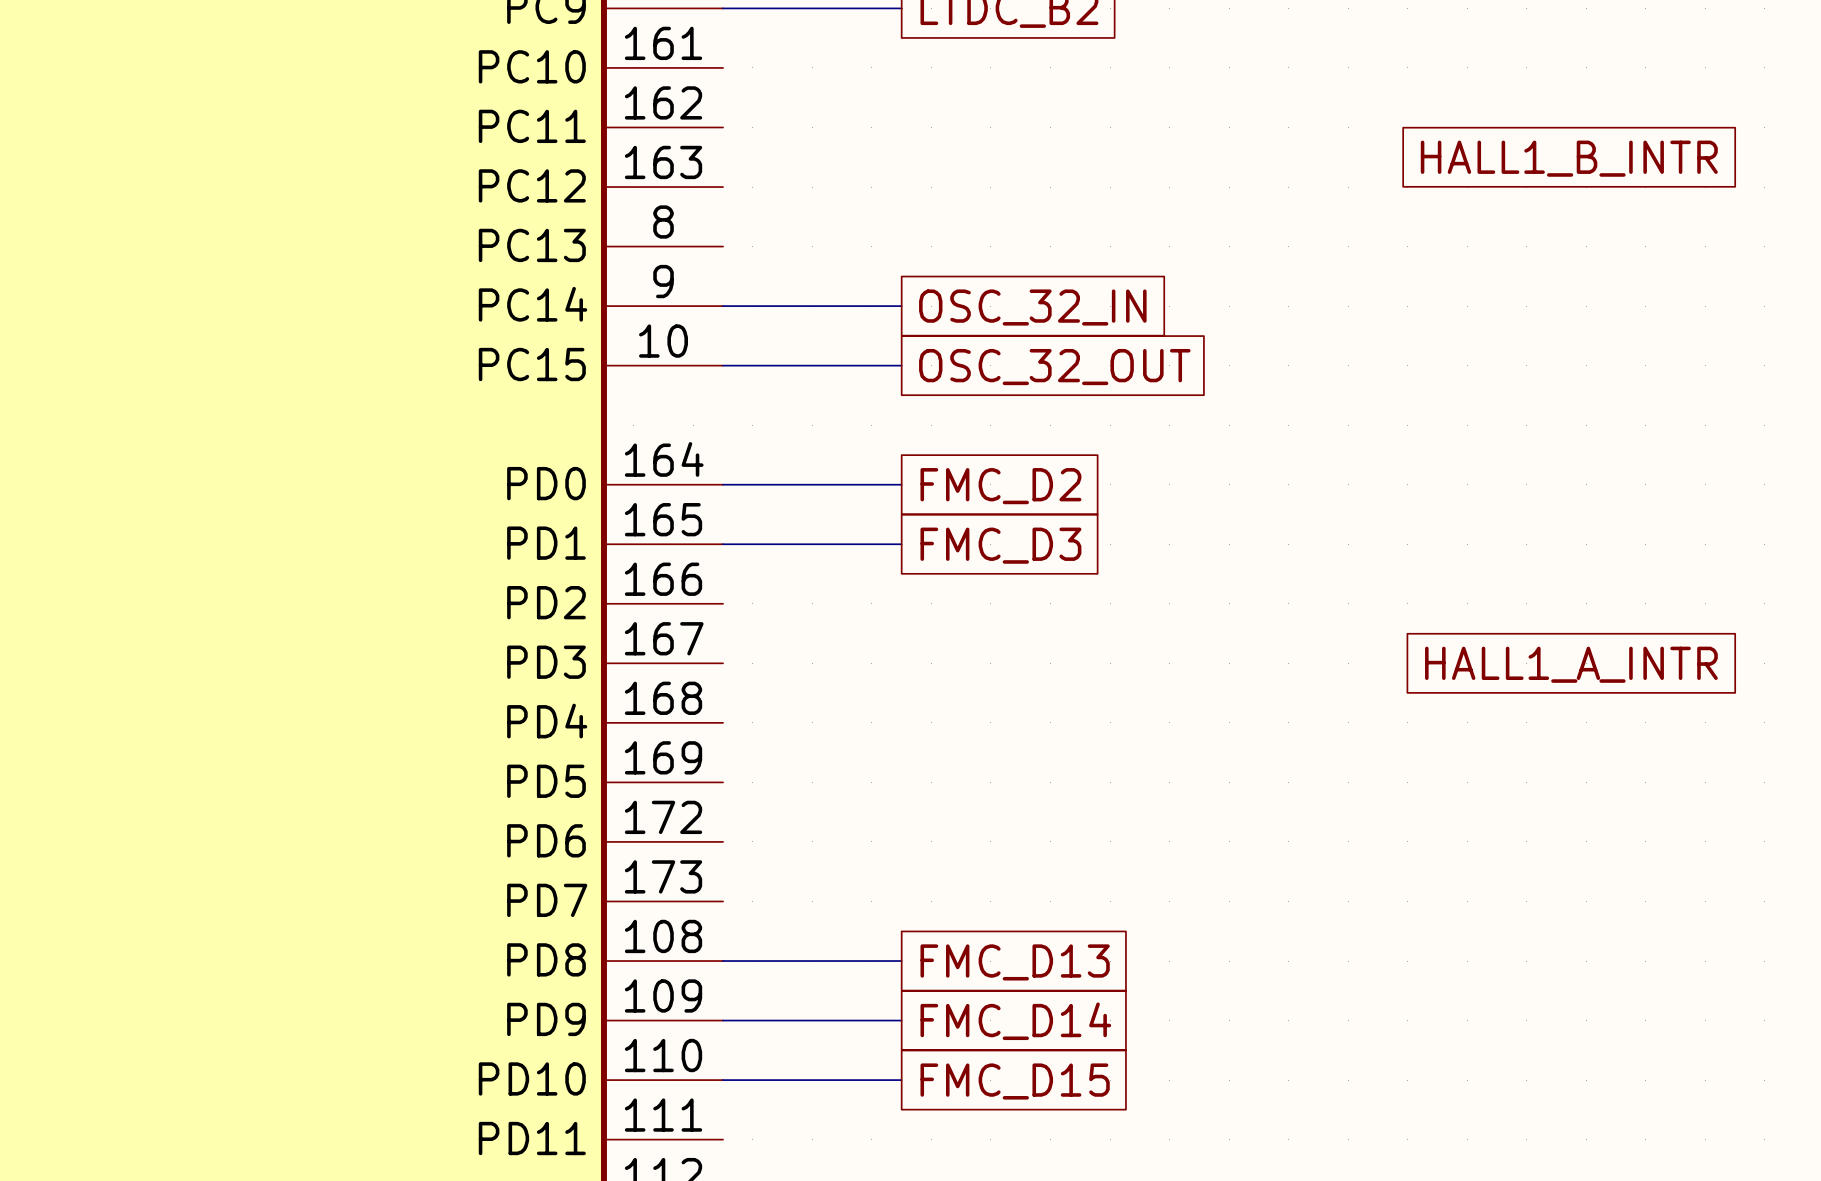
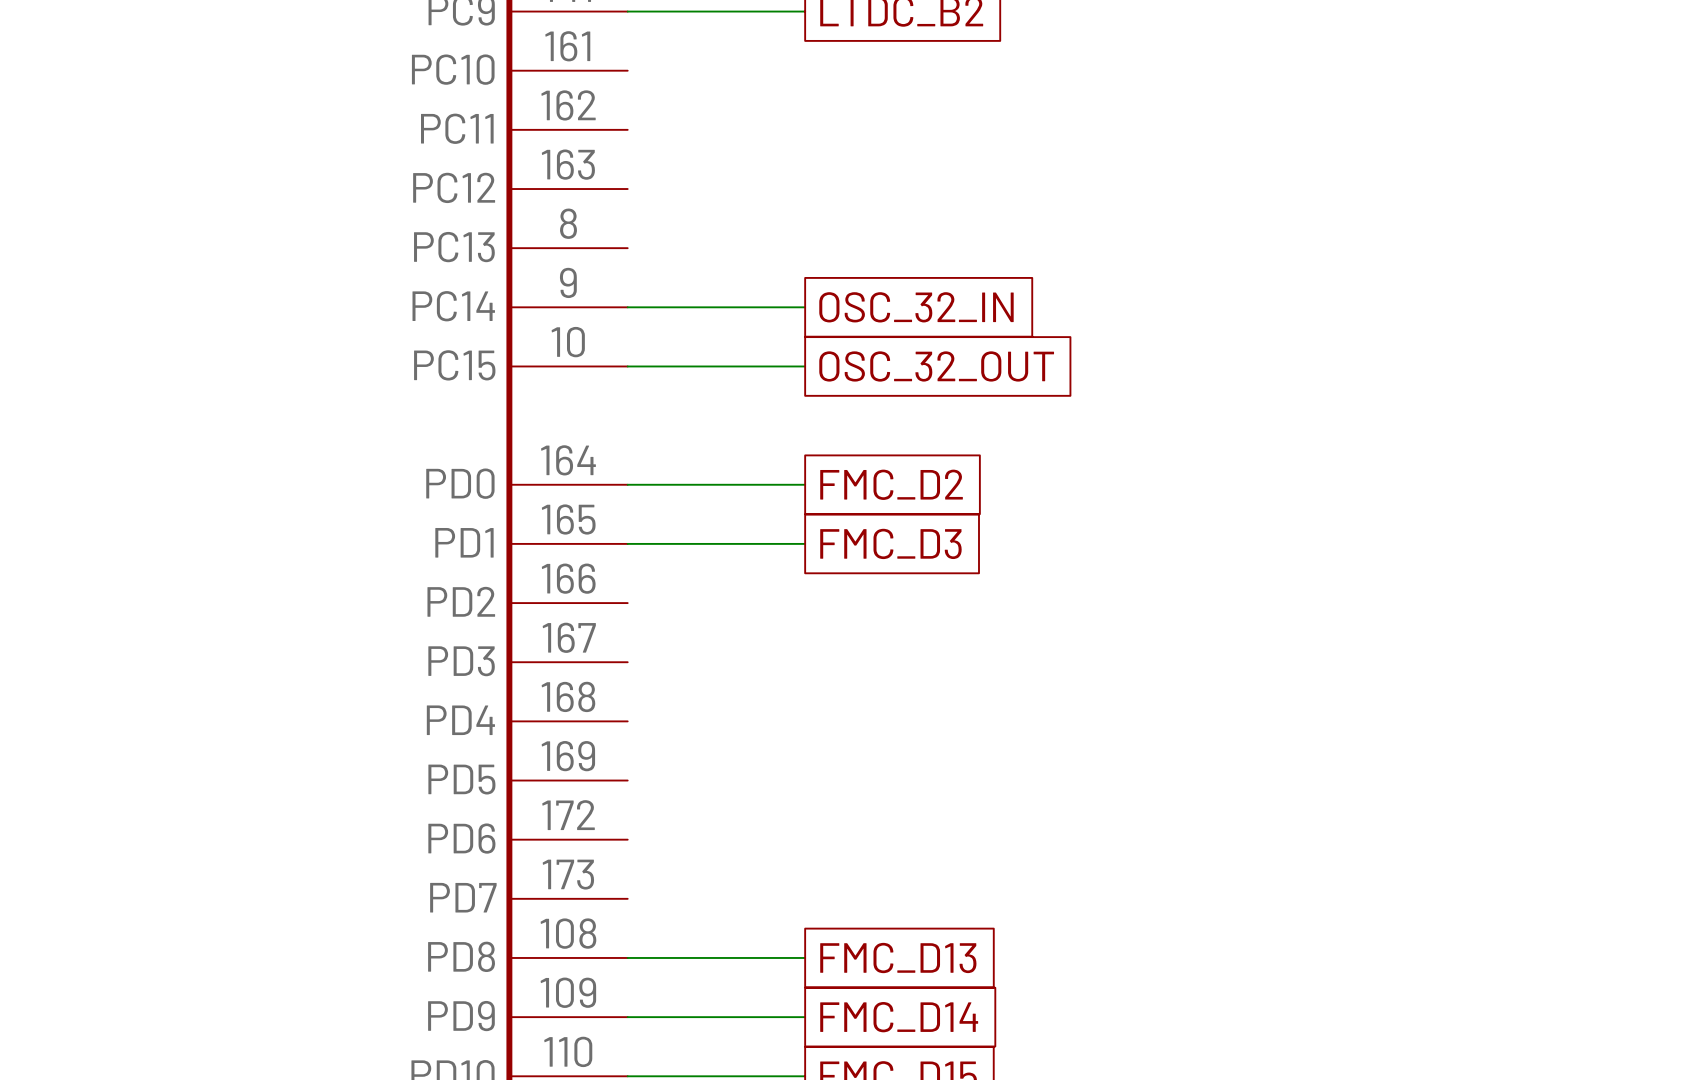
global label: HALL1_B_INTR (1569, 158) -> none
global label: HALL1_A_INTR (1571, 664) -> none

